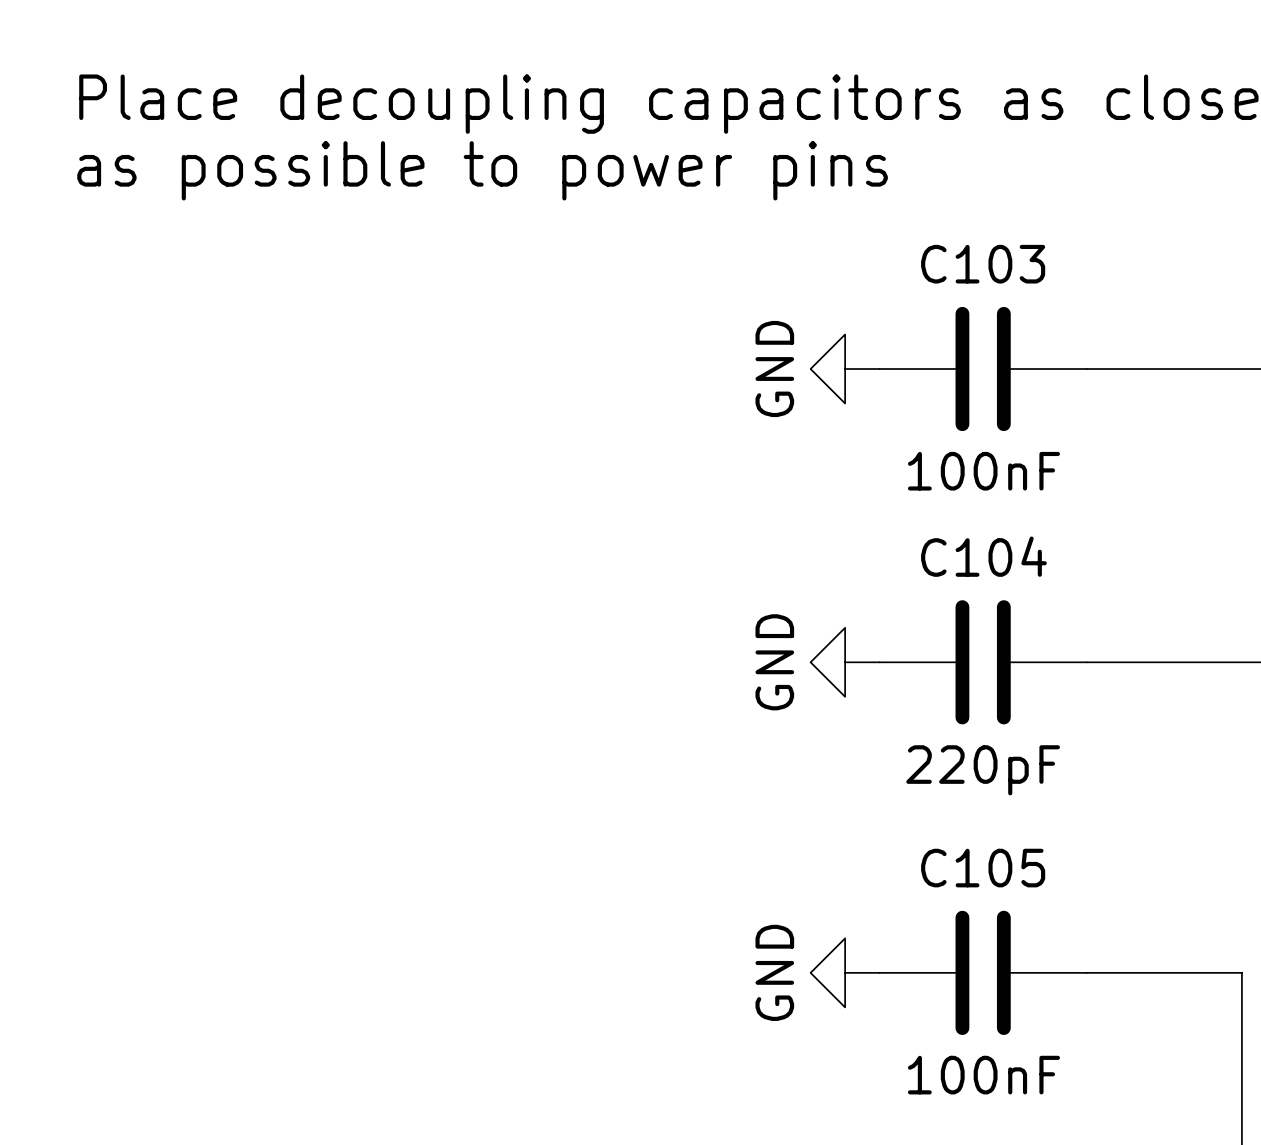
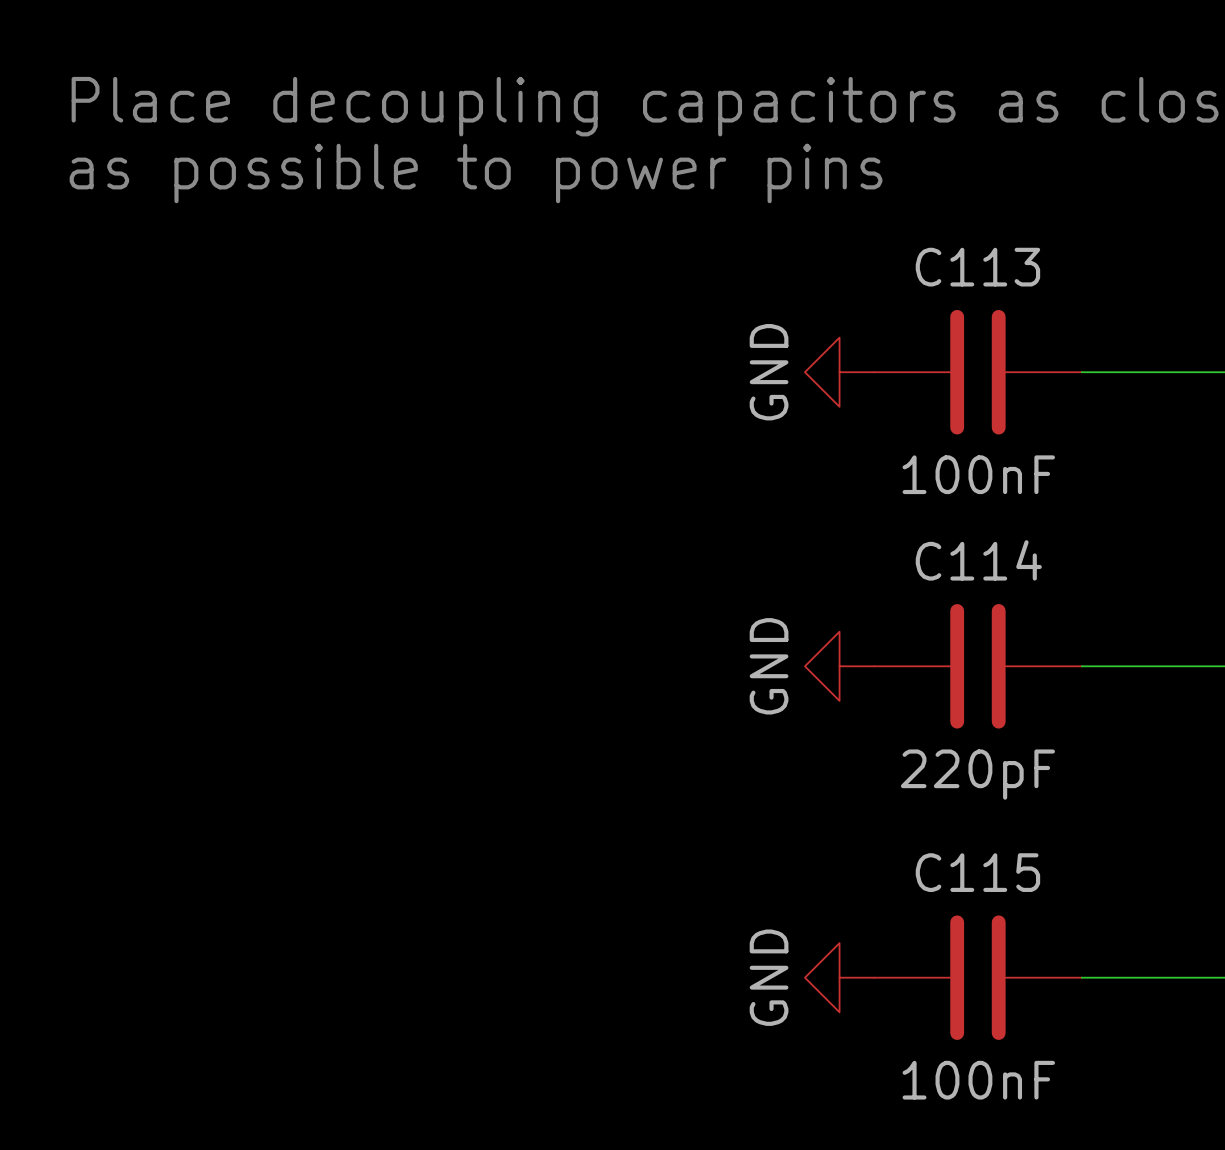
C103 name: C103 (983, 264) -> C113 (977, 267)
C104 name: C104 (983, 556) -> C114 (978, 560)
C105 name: C105 (983, 868) -> C115 (977, 872)

